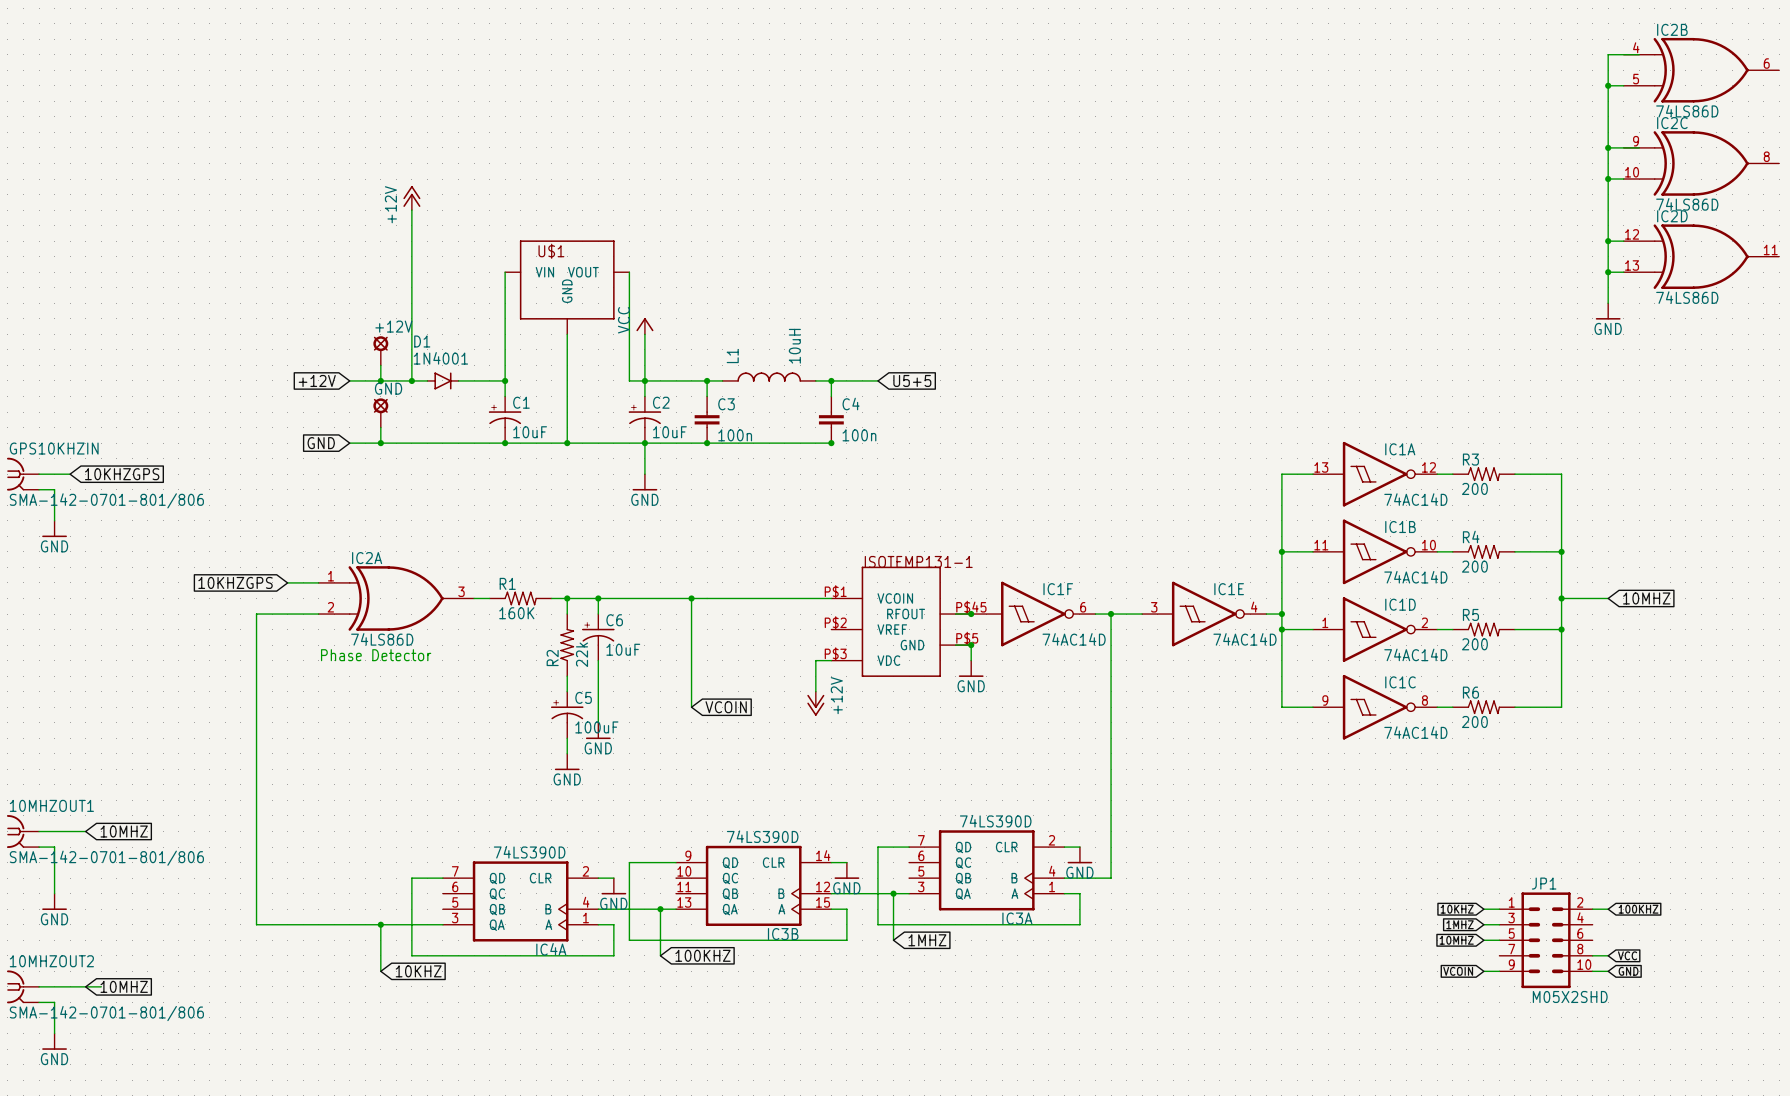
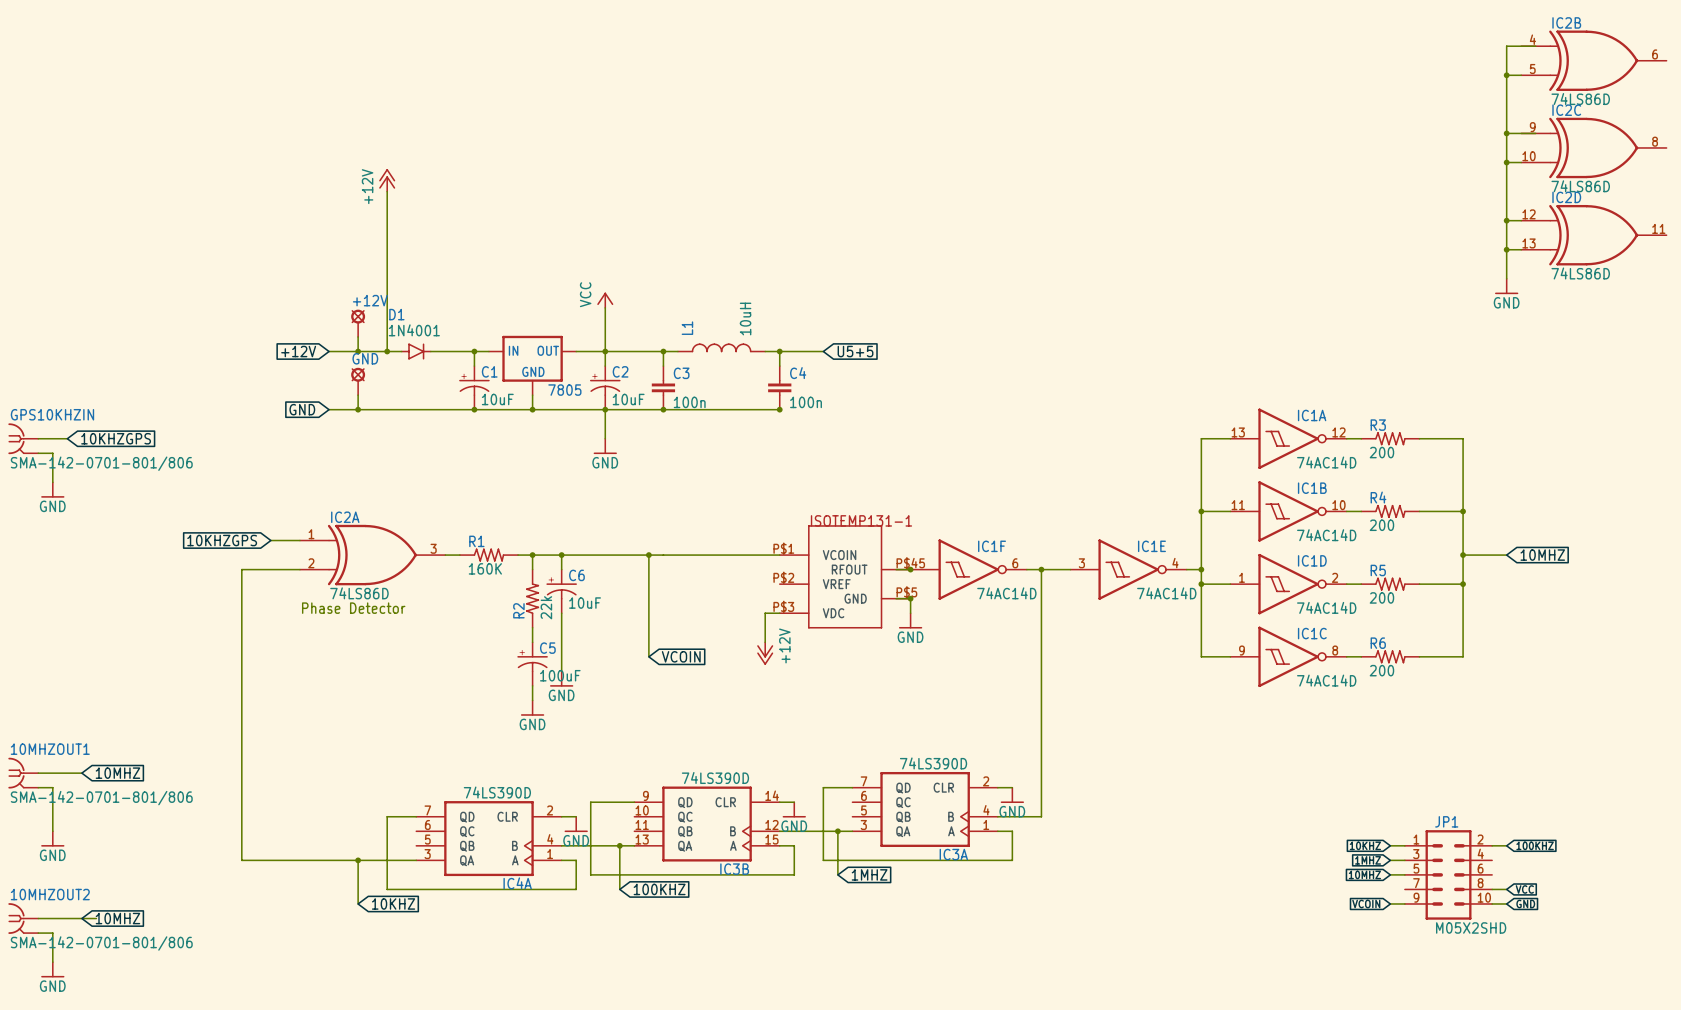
wire: (505, 272) (505, 380) -> (488, 351) (474, 351)
wire: (629, 272) (629, 380) -> (576, 351) (590, 351)
U$1: (567, 287) -> none
wire: (567, 334) (567, 427) -> none
7805: none -> (532, 365)

